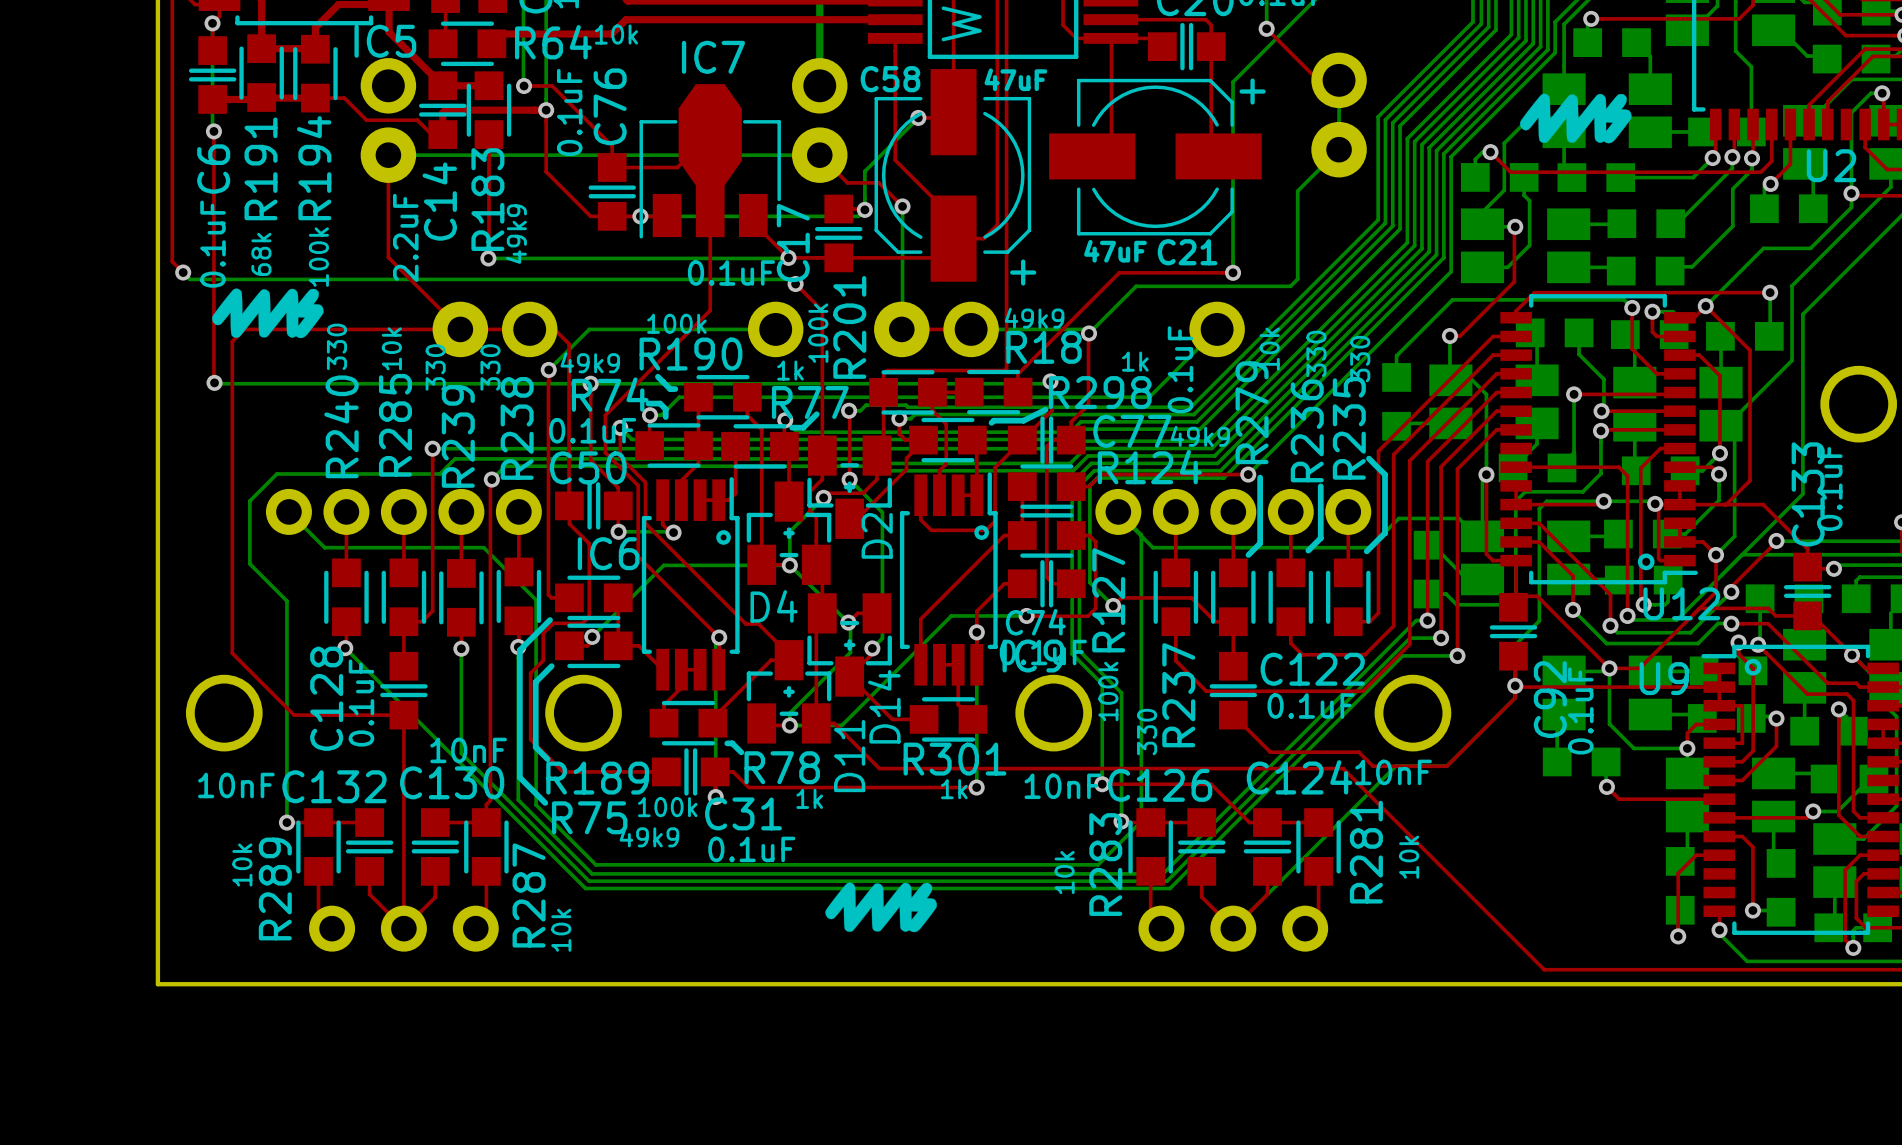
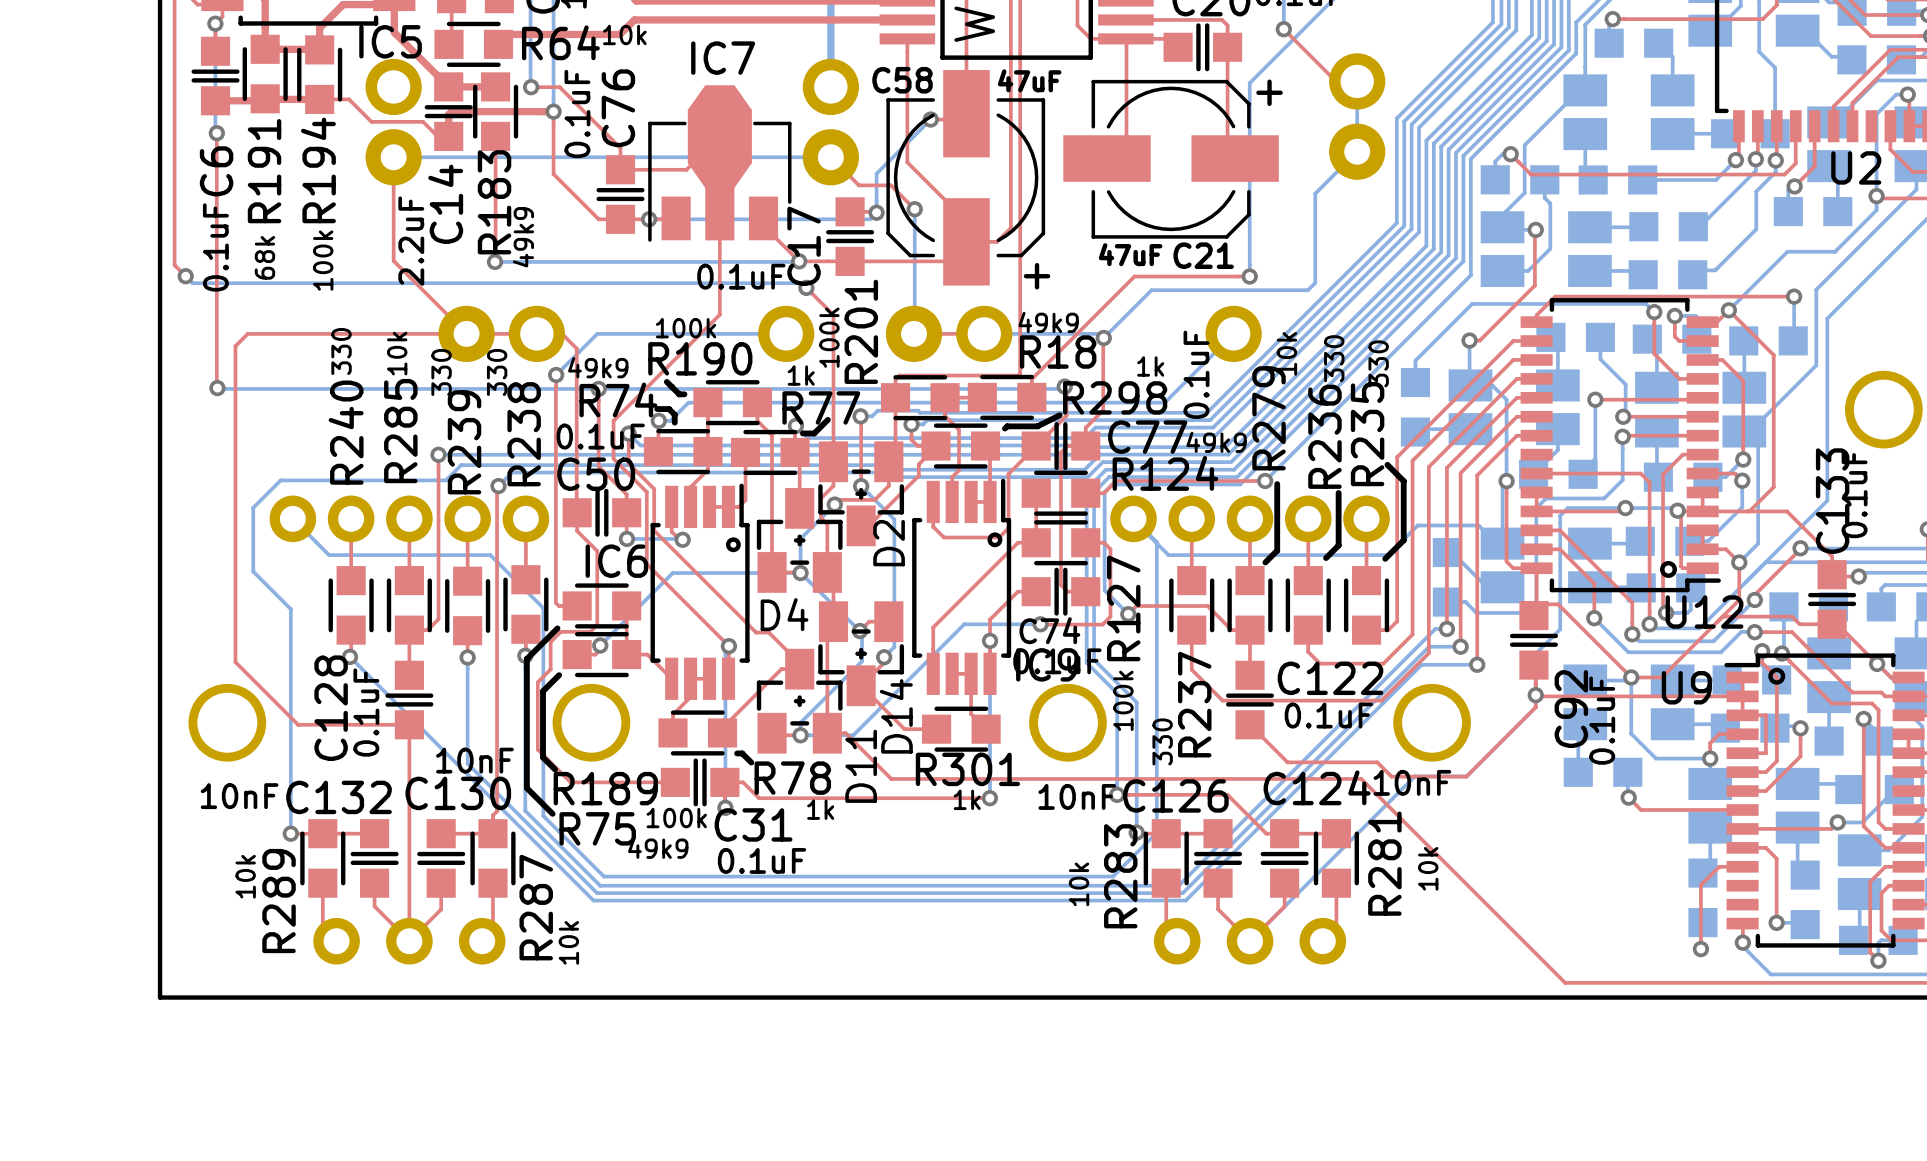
drawing: [1520, 93, 1632, 144] -> none
drawing: [212, 288, 324, 339] -> none
drawing: [825, 882, 937, 933] -> none

